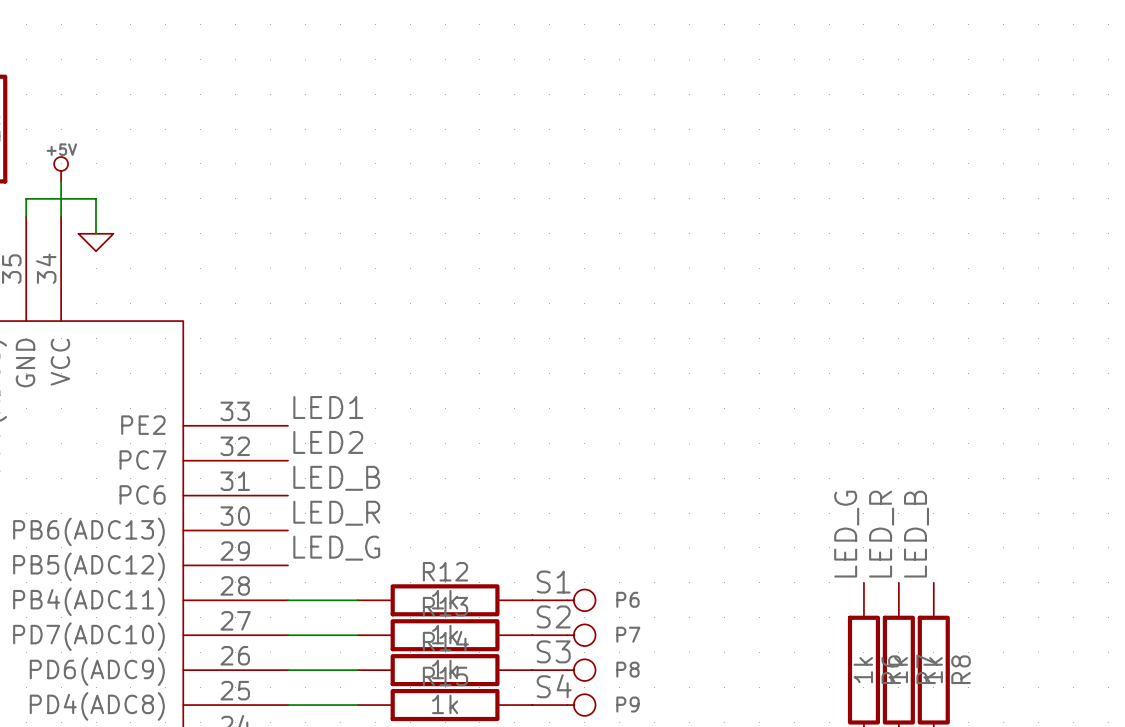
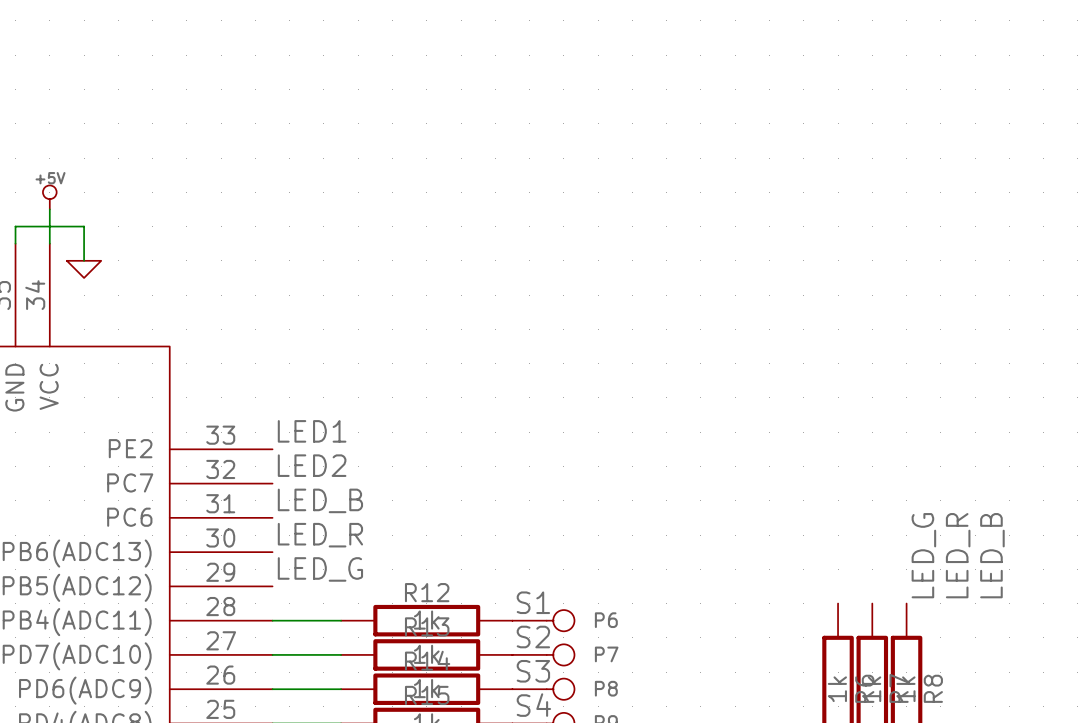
label position: LED_G (846, 534) -> LED_G (923, 555)
label position: LED_R (881, 534) -> LED_R (958, 555)
label position: LED_B (916, 534) -> LED_B (992, 555)

